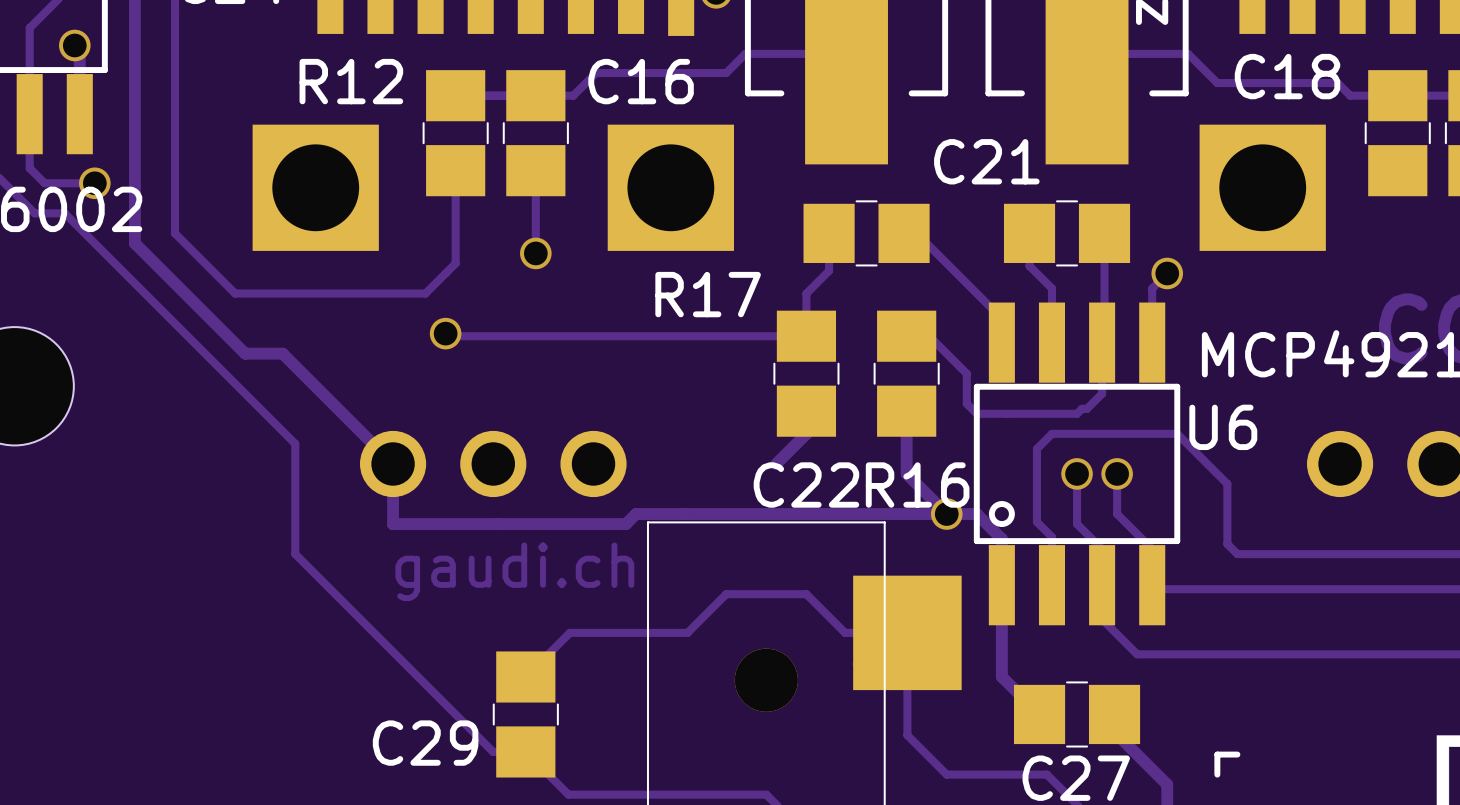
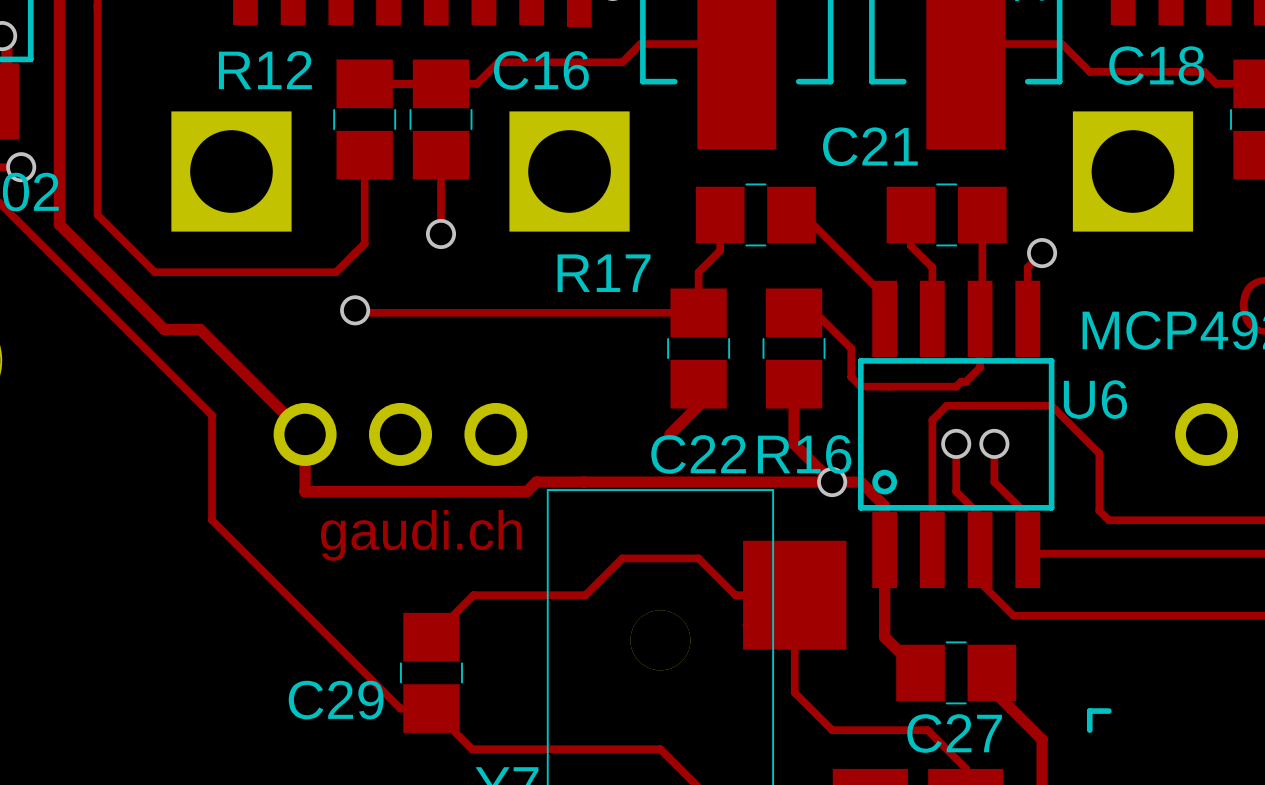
track: (1067, 433) (1051, 433) (1036, 448) (1036, 522) (1051, 537) -> (946, 405) (932, 420) (932, 503)

